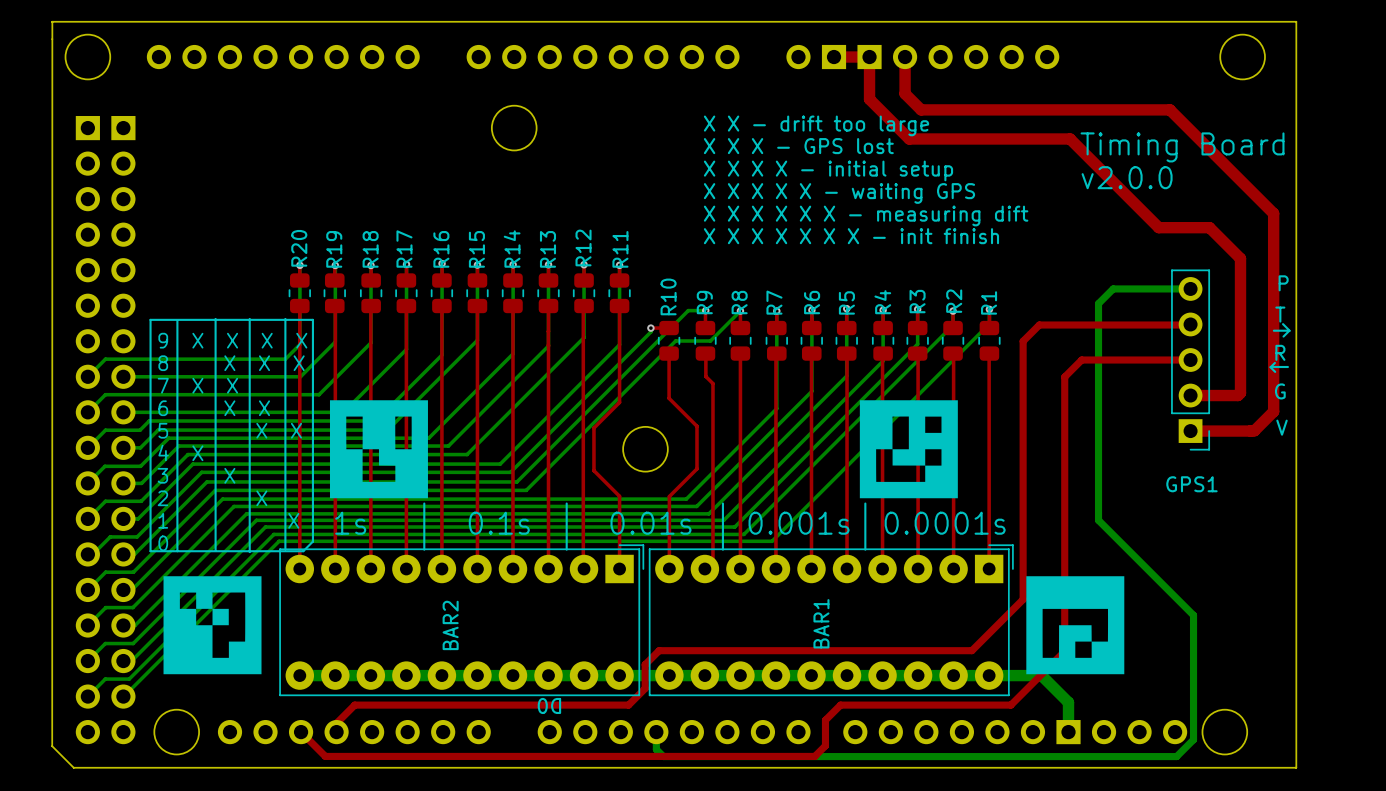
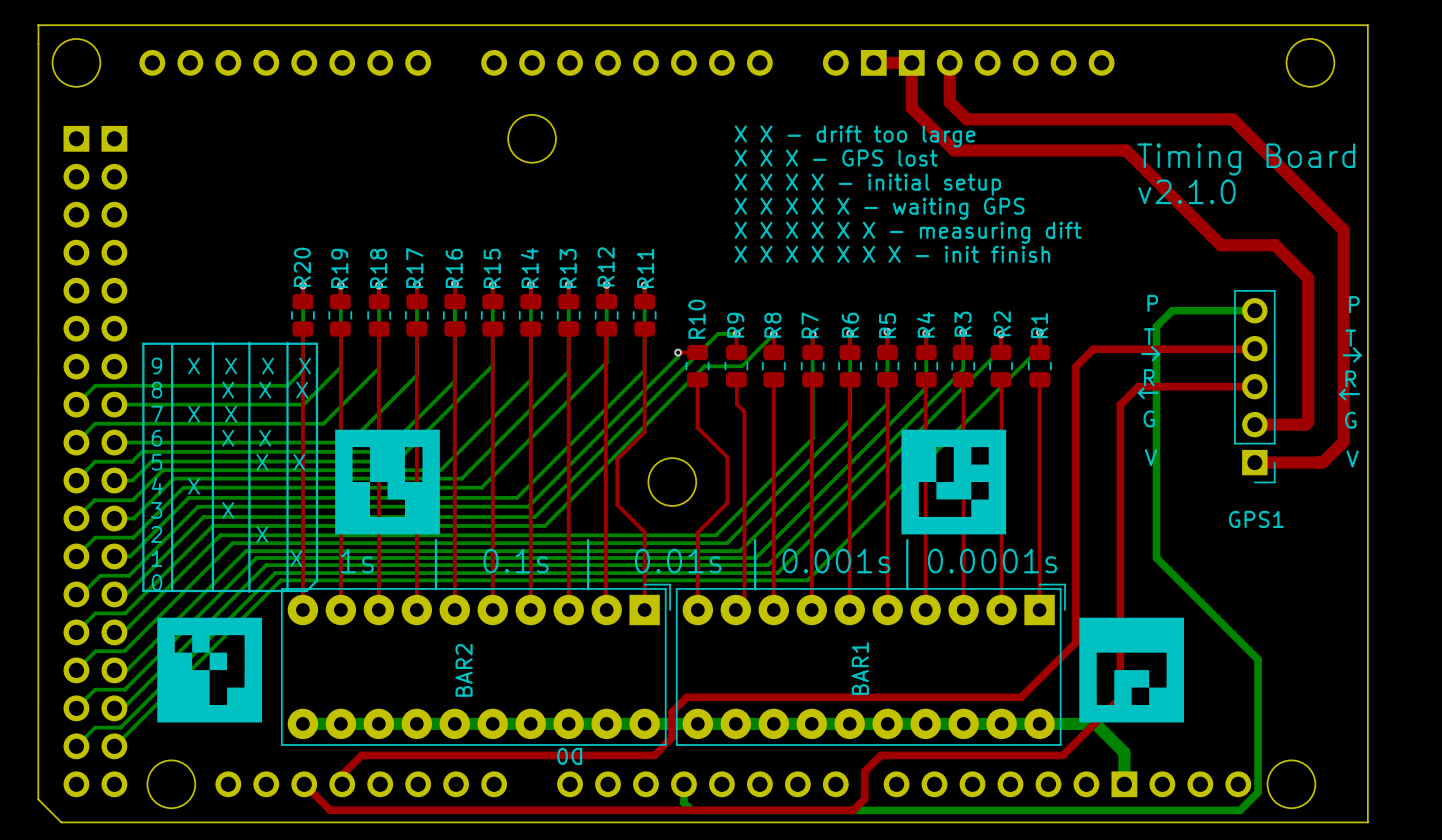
text: v2.0.0 (1127, 177) -> v2.1.0 (1186, 191)
text: none -> P (1152, 303)
text: none -> T (1149, 336)
line: none -> (1152, 347) (1159, 354)
line: none -> (1142, 354) (1156, 354)
line: none -> (1158, 354) (1152, 360)
text: none -> R (1149, 377)
line: none -> (1143, 388) (1138, 392)
line: none -> (1138, 392) (1143, 398)
line: none -> (1141, 392) (1157, 392)
text: none -> G (1149, 418)
text: none -> V (1151, 457)

